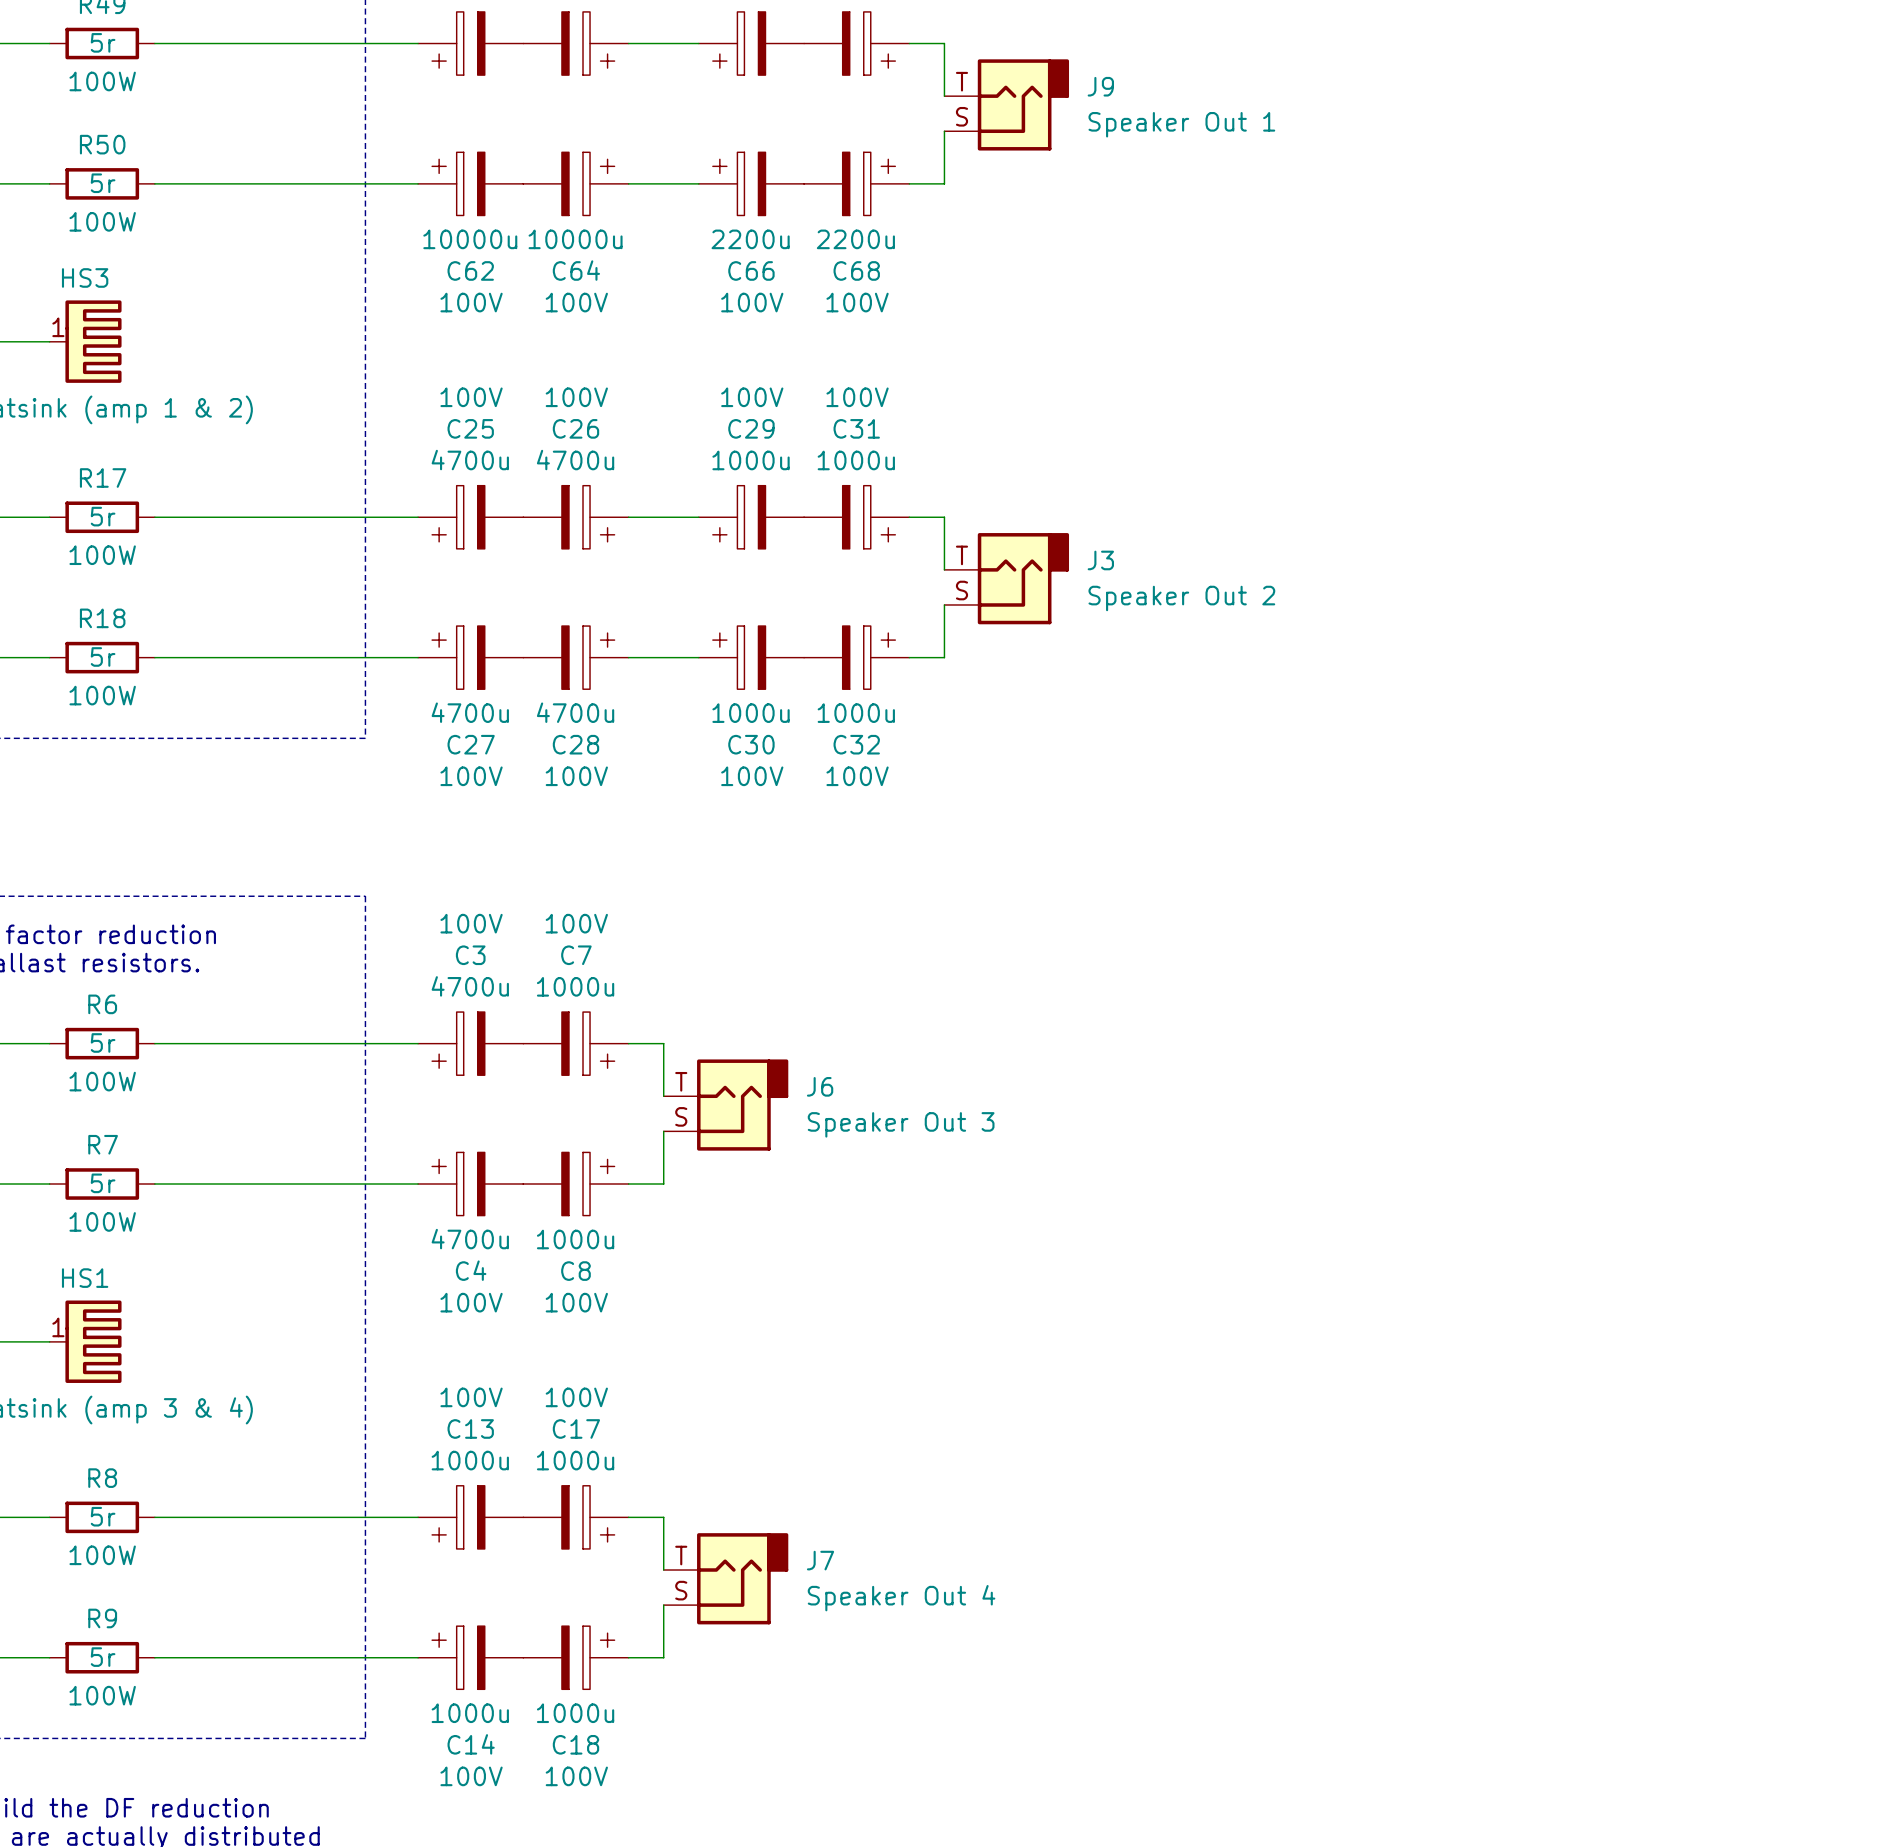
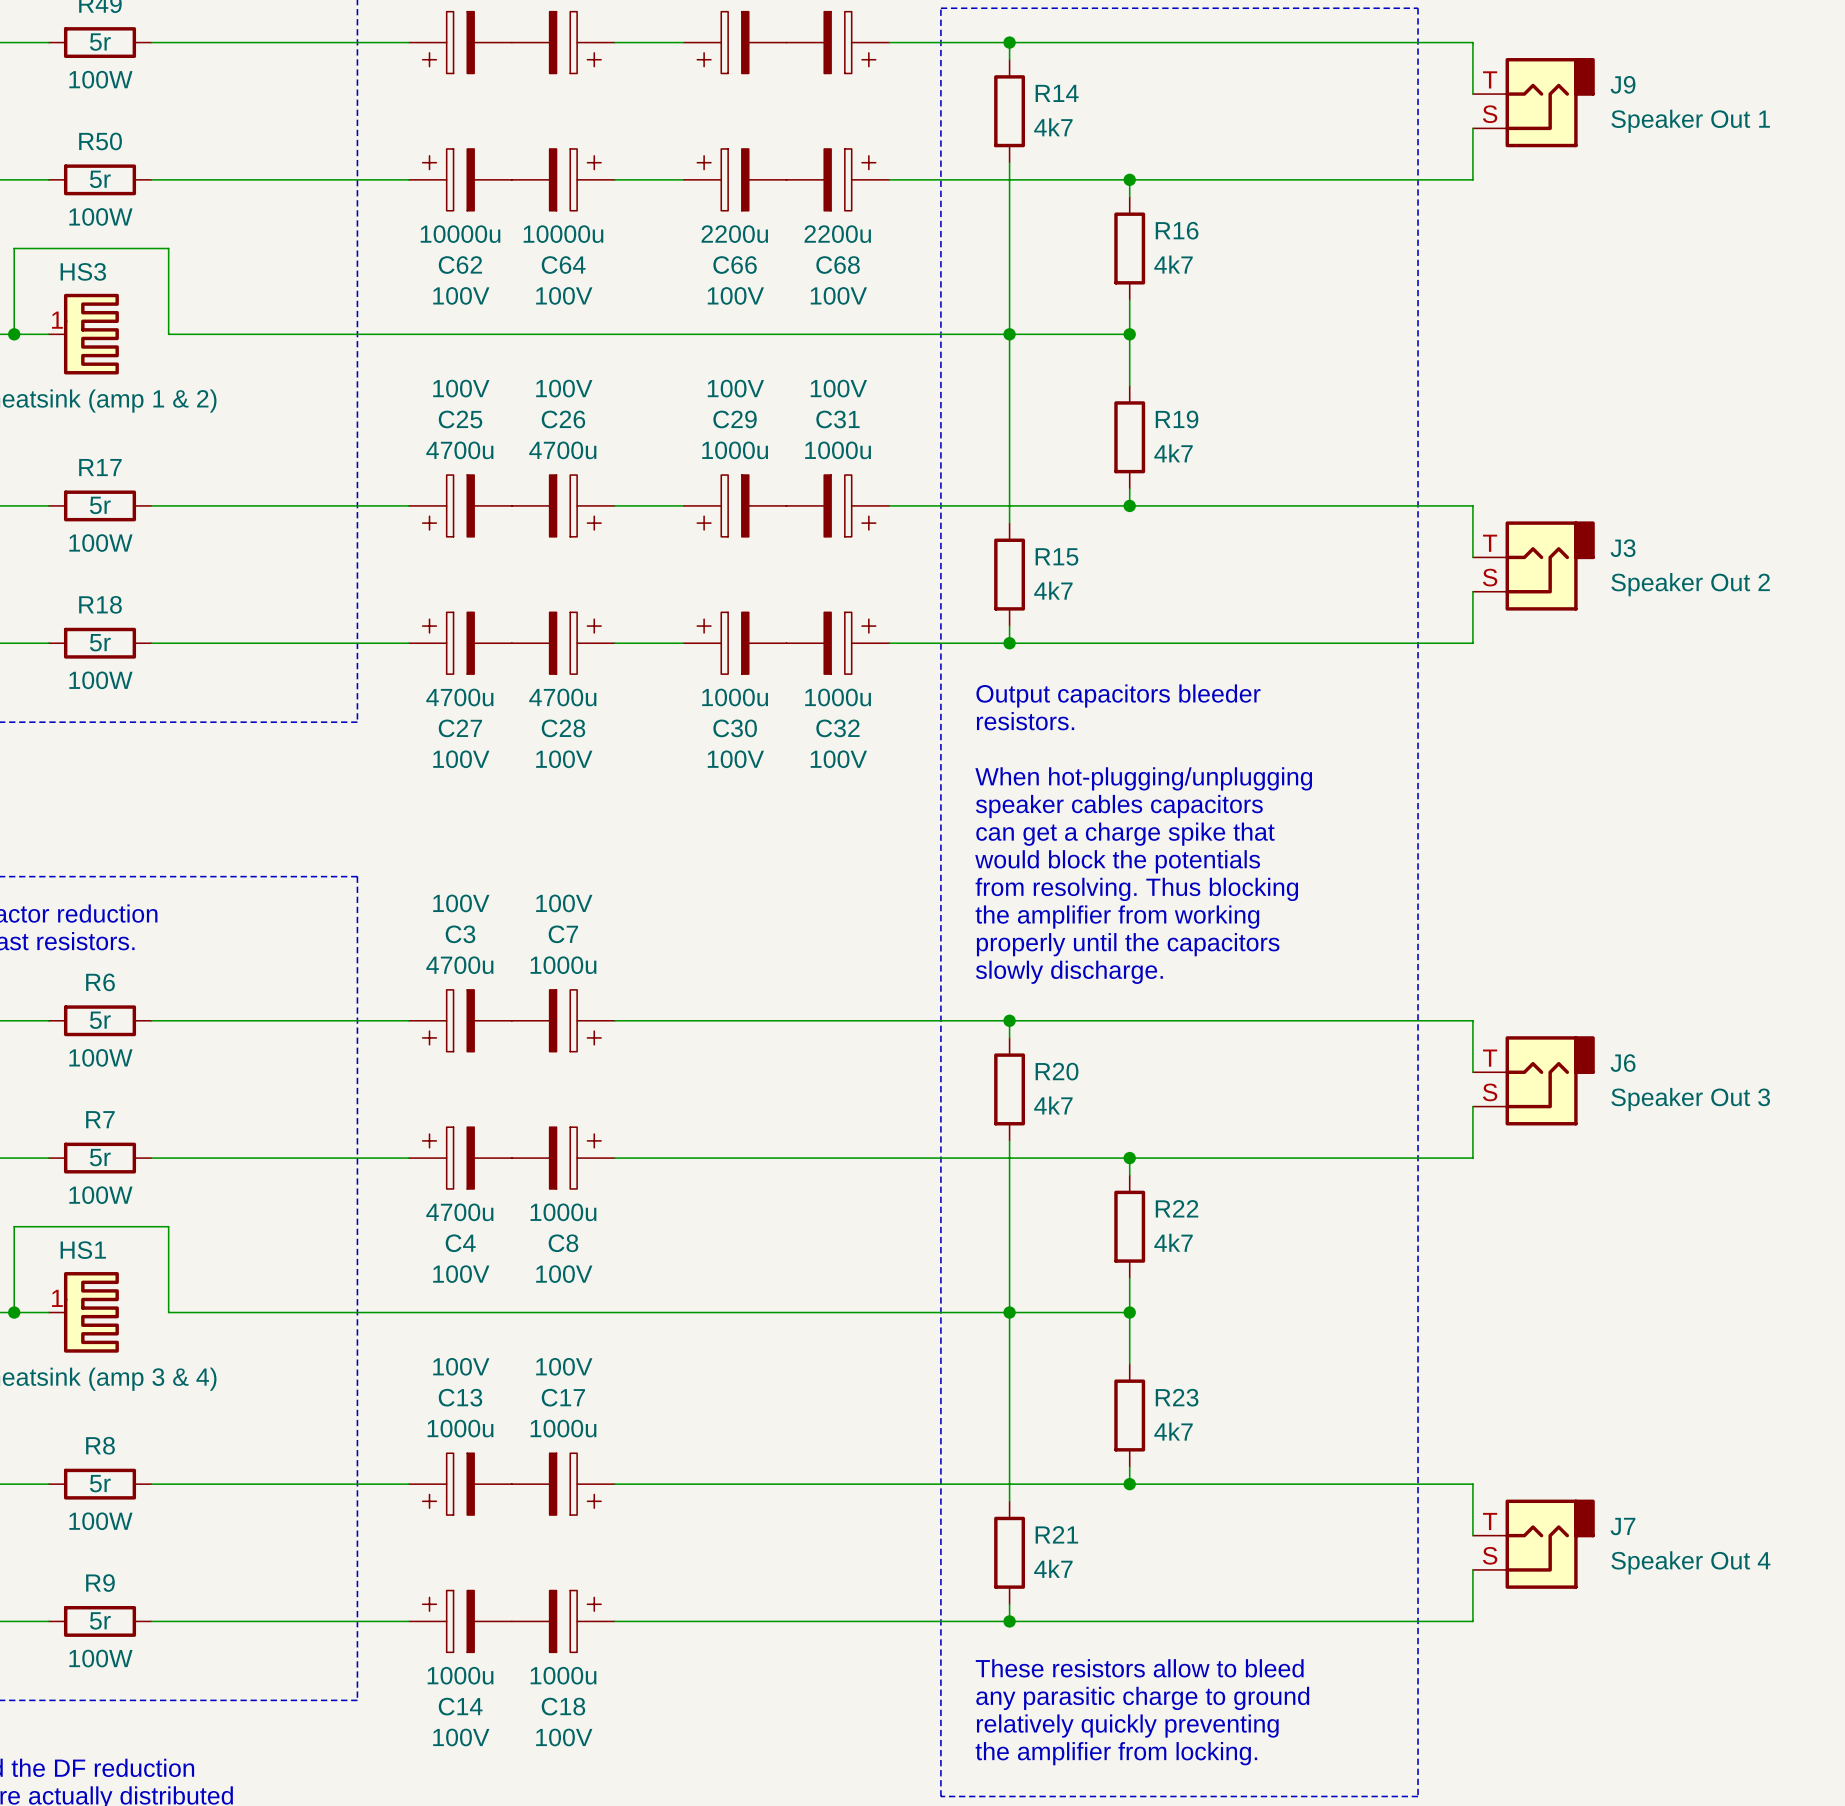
line: none -> (940, 8) (1418, 8) (1418, 1796) (940, 1796) (940, 8)
wire: (944, 43) (944, 96) -> (923, 42) (1472, 42) (1472, 94)
wire: none -> (1009, 42) (1009, 59)
junction: none -> (1009, 42)
J9 position: (1006, 104) -> (1533, 102)
R14: none -> 4k7 (1009, 111)
wire: (944, 131) (944, 183) -> (1472, 128) (1472, 179) (923, 179)
wire: none -> (1009, 162) (1009, 523)
wire: none -> (1129, 179) (1129, 197)
junction: none -> (1129, 179)
R16: none -> 4k7 (1129, 248)
wire: none -> (1129, 299) (1129, 385)
wire: none -> (14, 334) (14, 248) (168, 248) (168, 334) (1129, 334)
junction: none -> (14, 334)
junction: none -> (1009, 334)
junction: none -> (1129, 334)
R19: none -> 4k7 (1129, 437)
wire: none -> (1129, 488) (1129, 505)
wire: (944, 517) (944, 569) -> (923, 505) (1472, 505) (1472, 557)
junction: none -> (1129, 505)
J3 position: (1006, 578) -> (1533, 566)
R15: none -> 4k7 (1009, 574)
wire: (944, 604) (944, 657) -> (1472, 591) (1472, 643) (923, 643)
wire: none -> (1009, 626) (1009, 643)
junction: none -> (1009, 643)
text: none -> Output capacitors bleeder (1118, 696)
text: none -> resistors. (1025, 721)
text: none -> When hot-plugging/unplugging (1143, 778)
text: none -> speaker cables capacitors (1119, 806)
text: none -> can get a charge spike that (1125, 834)
text: none -> would block the potentials (1117, 861)
text: none -> from resolving. Thus blocking (1136, 889)
text: none -> the amplifier from working (1117, 917)
text: none -> properly until the capacitors (1128, 944)
text: none -> slowly discharge. (1069, 972)
wire: (663, 1043) (663, 1096) -> (649, 1020) (1472, 1020) (1472, 1072)
wire: none -> (1009, 1020) (1009, 1037)
junction: none -> (1009, 1020)
J6 position: (726, 1105) -> (1533, 1080)
R20: none -> 4k7 (1009, 1089)
wire: (663, 1131) (663, 1184) -> (1472, 1106) (1472, 1158) (649, 1158)
wire: none -> (1009, 1140) (1009, 1501)
wire: none -> (1129, 1158) (1129, 1175)
junction: none -> (1129, 1158)
R22: none -> 4k7 (1129, 1226)
wire: none -> (1129, 1278) (1129, 1364)
wire: none -> (14, 1312) (14, 1226) (168, 1226) (168, 1312) (1129, 1312)
junction: none -> (14, 1312)
junction: none -> (1009, 1312)
junction: none -> (1129, 1312)
R23: none -> 4k7 (1129, 1415)
wire: none -> (1129, 1466) (1129, 1484)
wire: (663, 1517) (663, 1570) -> (649, 1484) (1472, 1484) (1472, 1535)
junction: none -> (1129, 1484)
J7 position: (726, 1578) -> (1533, 1544)
R21: none -> 4k7 (1009, 1552)
wire: (663, 1605) (663, 1657) -> (1472, 1569) (1472, 1621) (649, 1621)
wire: none -> (1009, 1604) (1009, 1621)
junction: none -> (1009, 1621)
text: none -> These resistors allow to bleed (1139, 1668)
text: none -> any parasitic charge to ground (1142, 1698)
text: none -> relatively quickly preventing (1127, 1726)
text: none -> the amplifier from locking. (1116, 1753)

